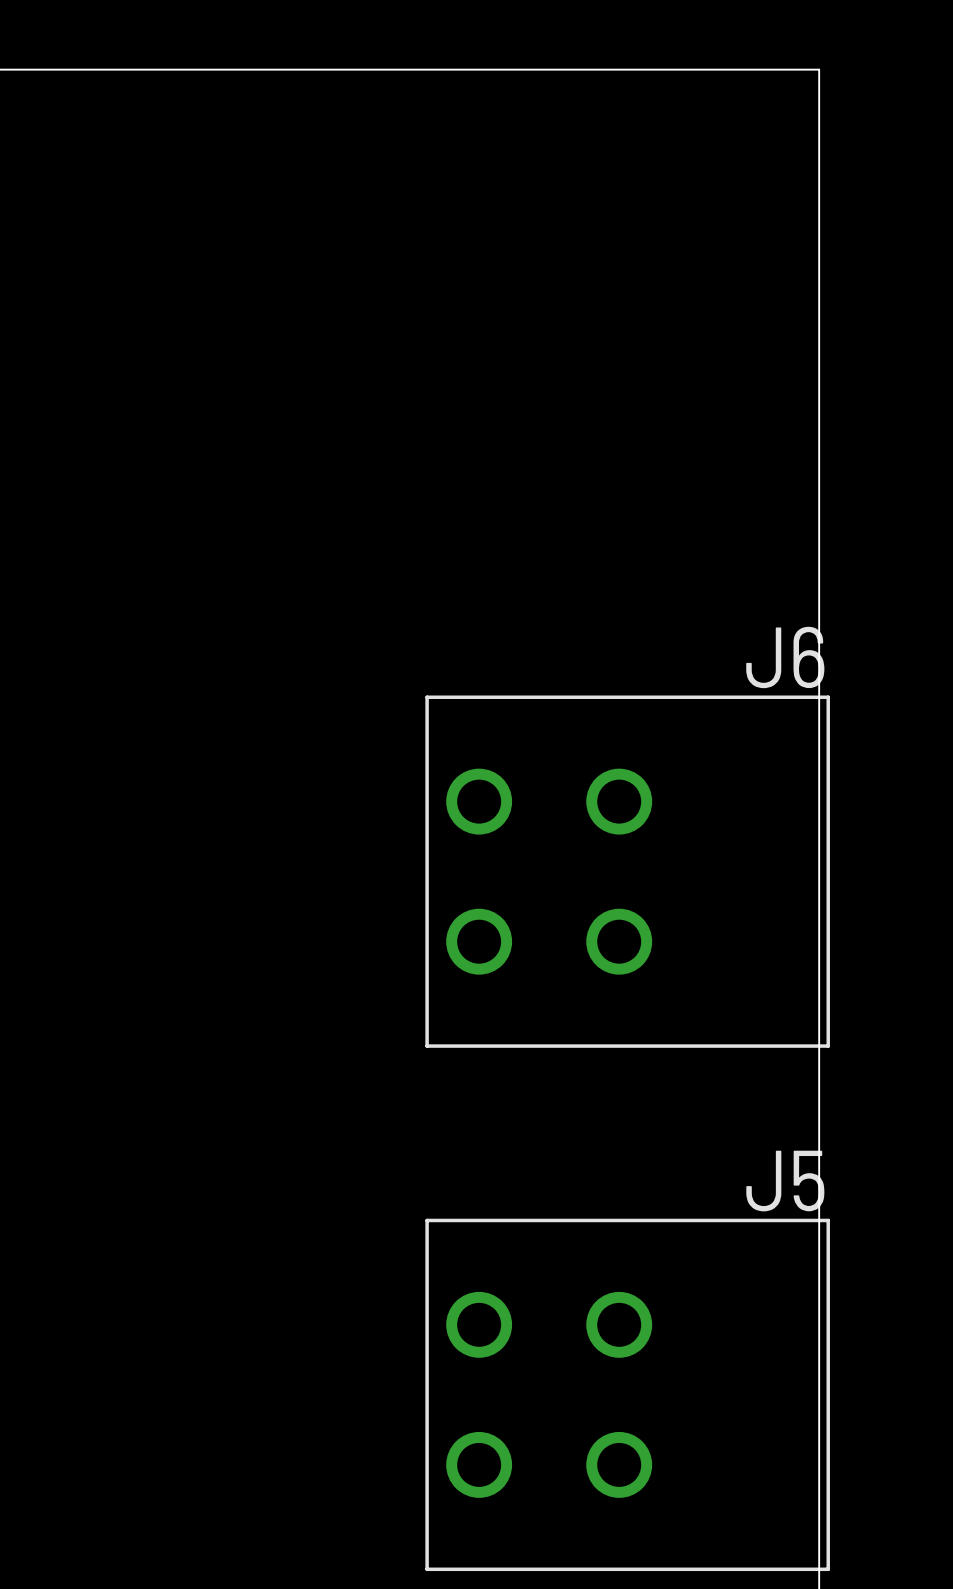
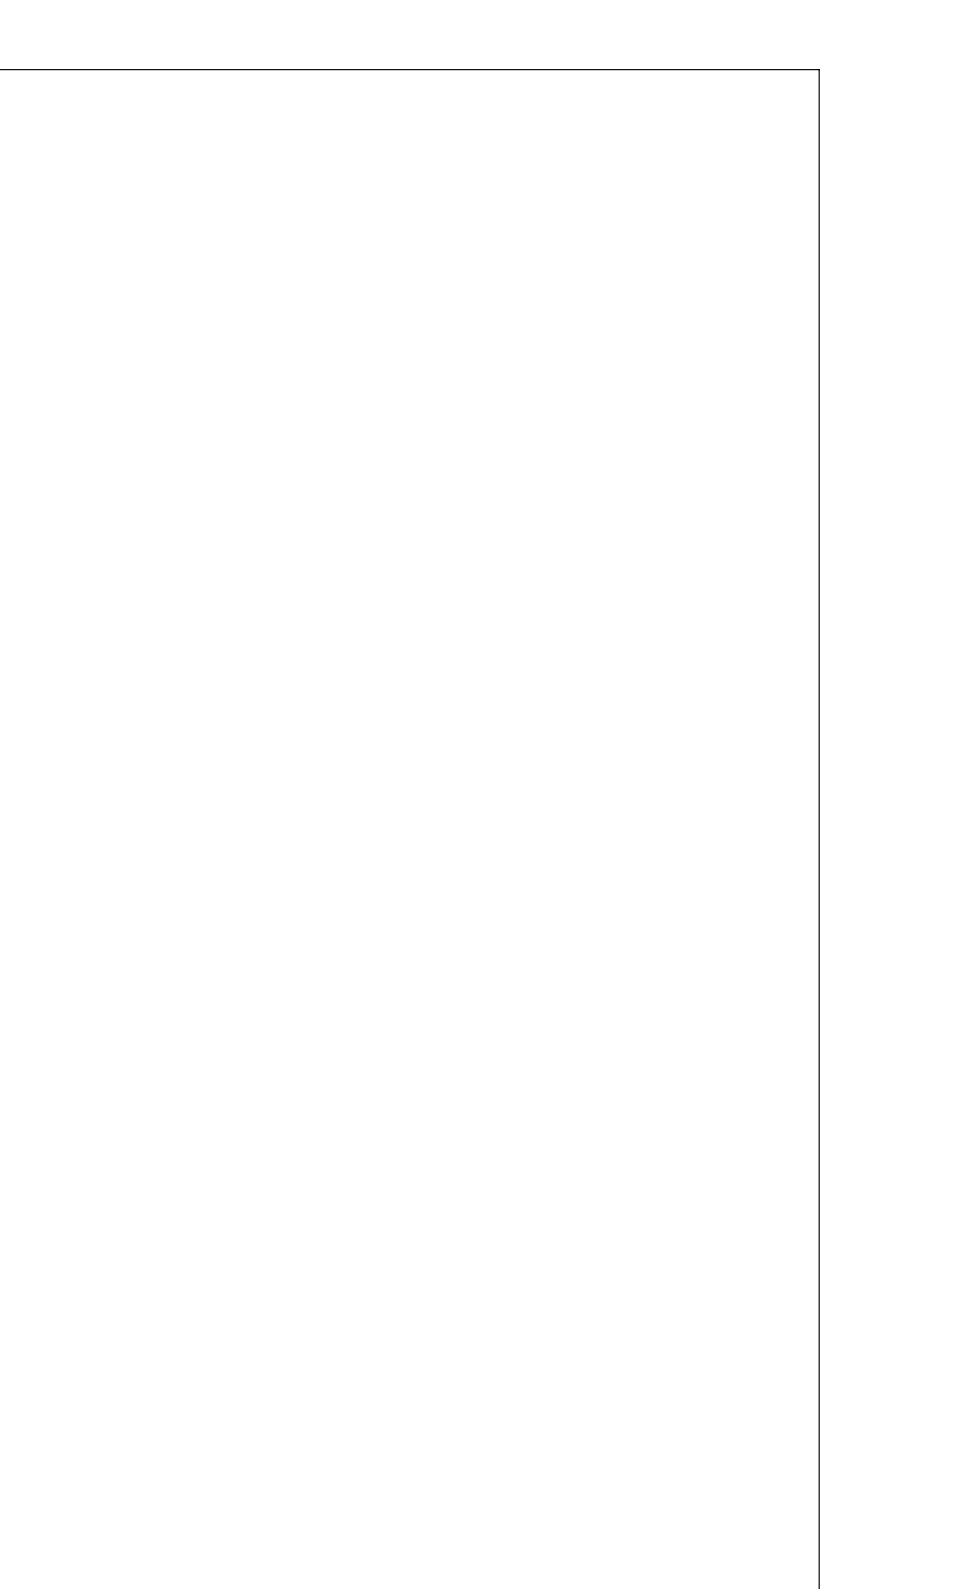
J6: (627, 871) -> none
J5: (627, 1394) -> none

